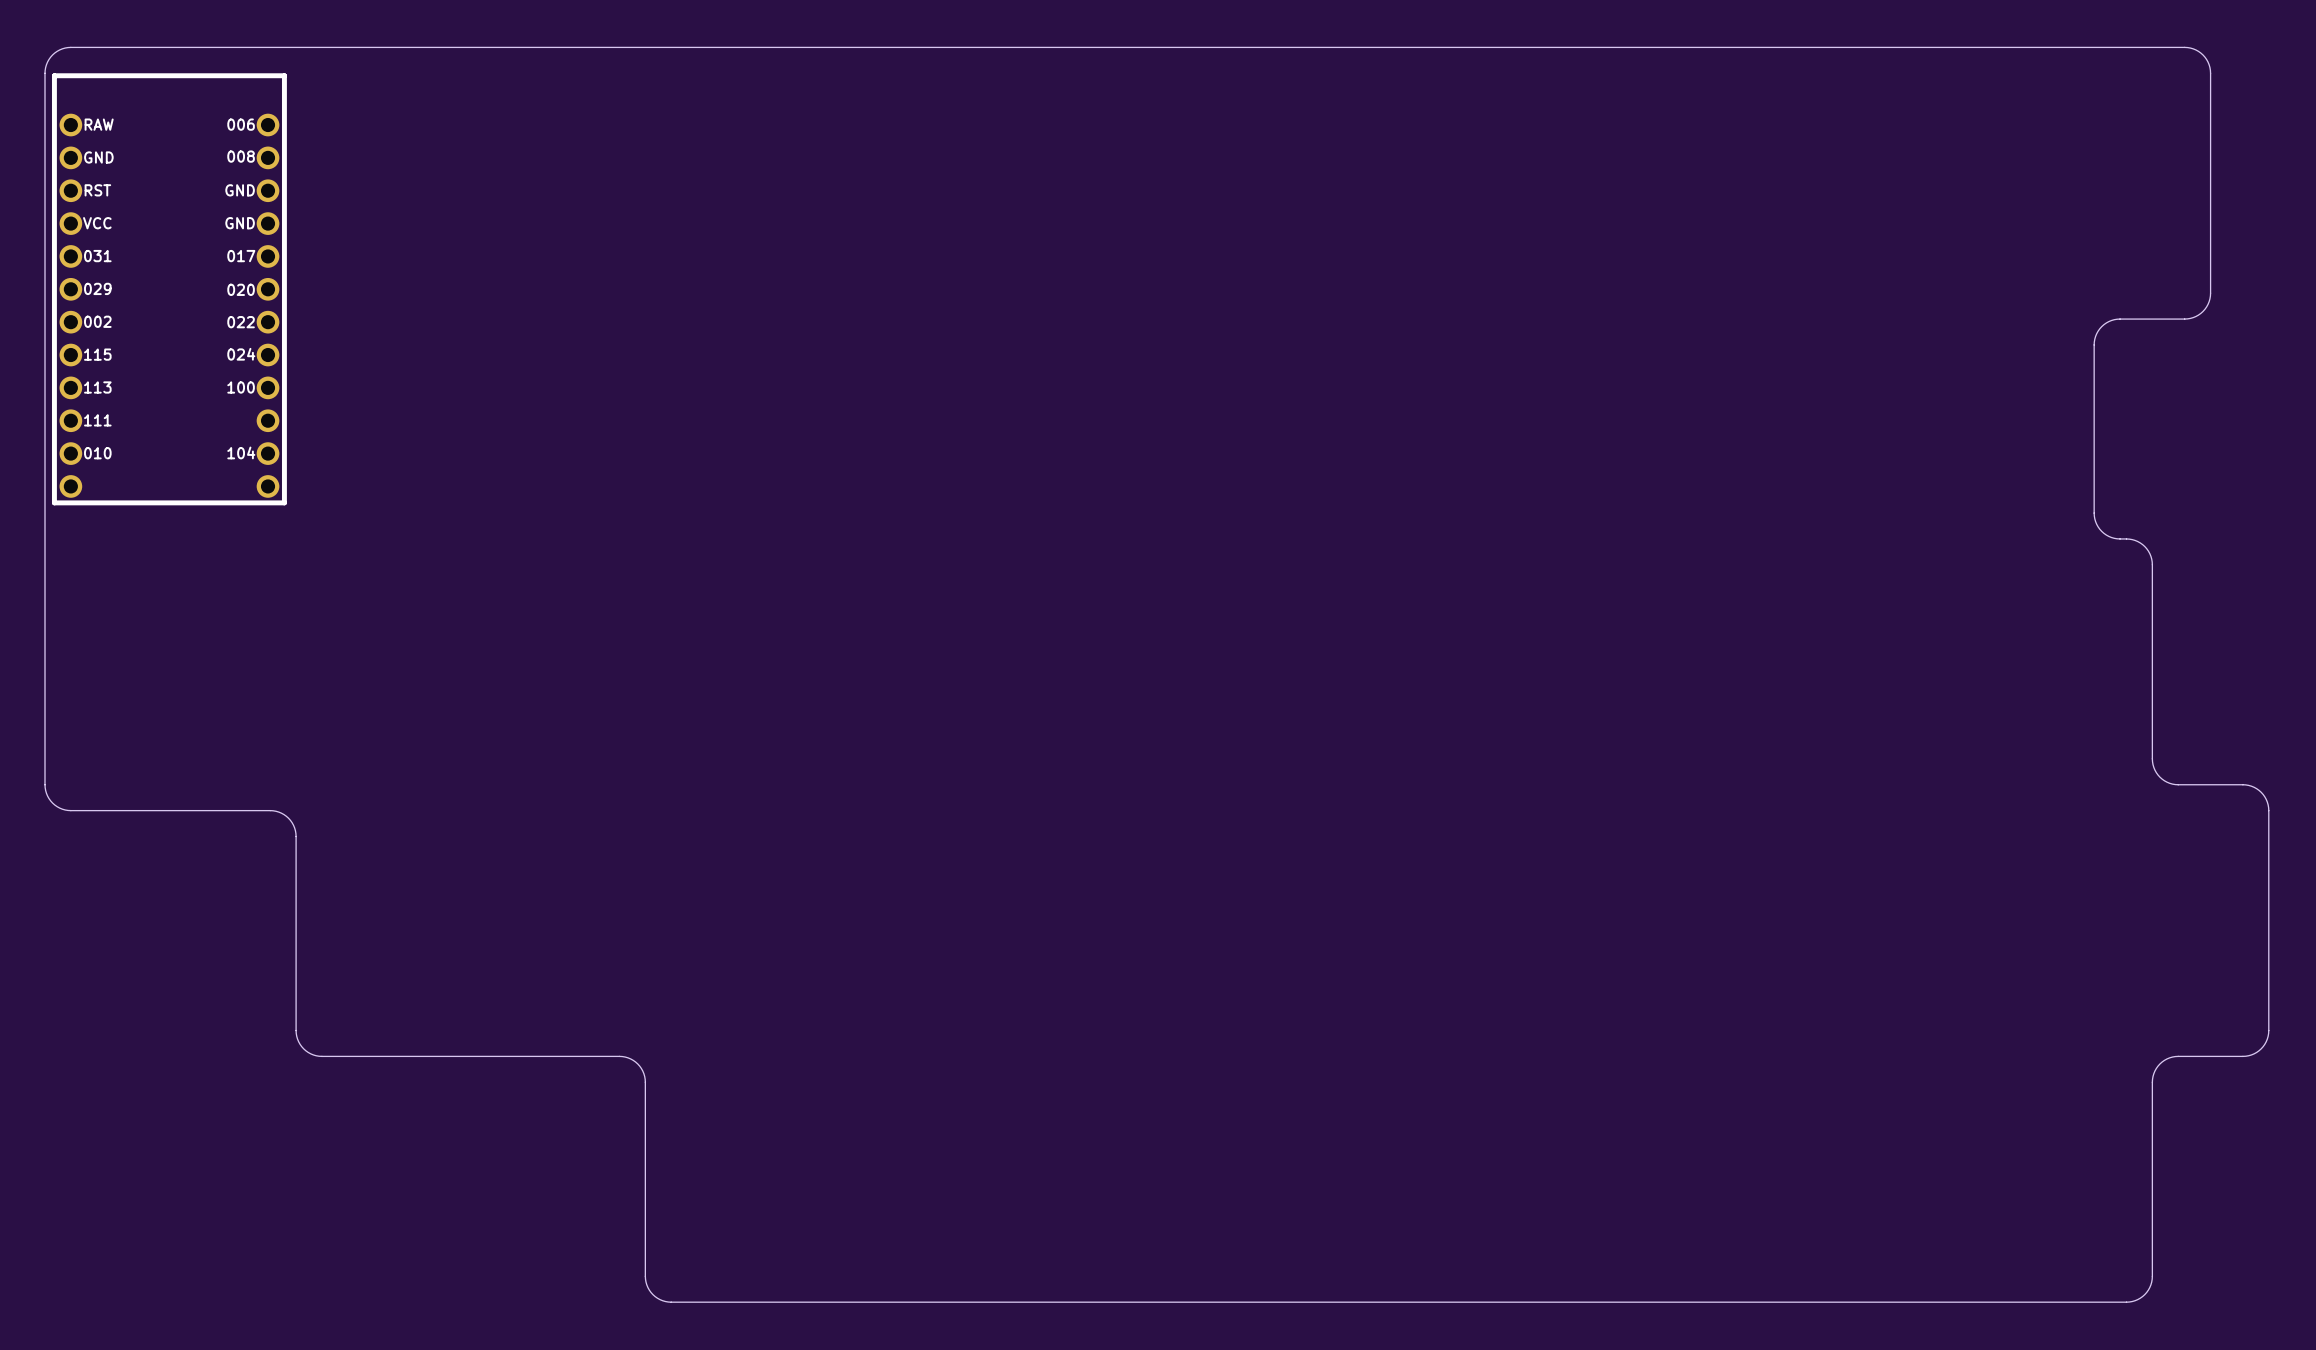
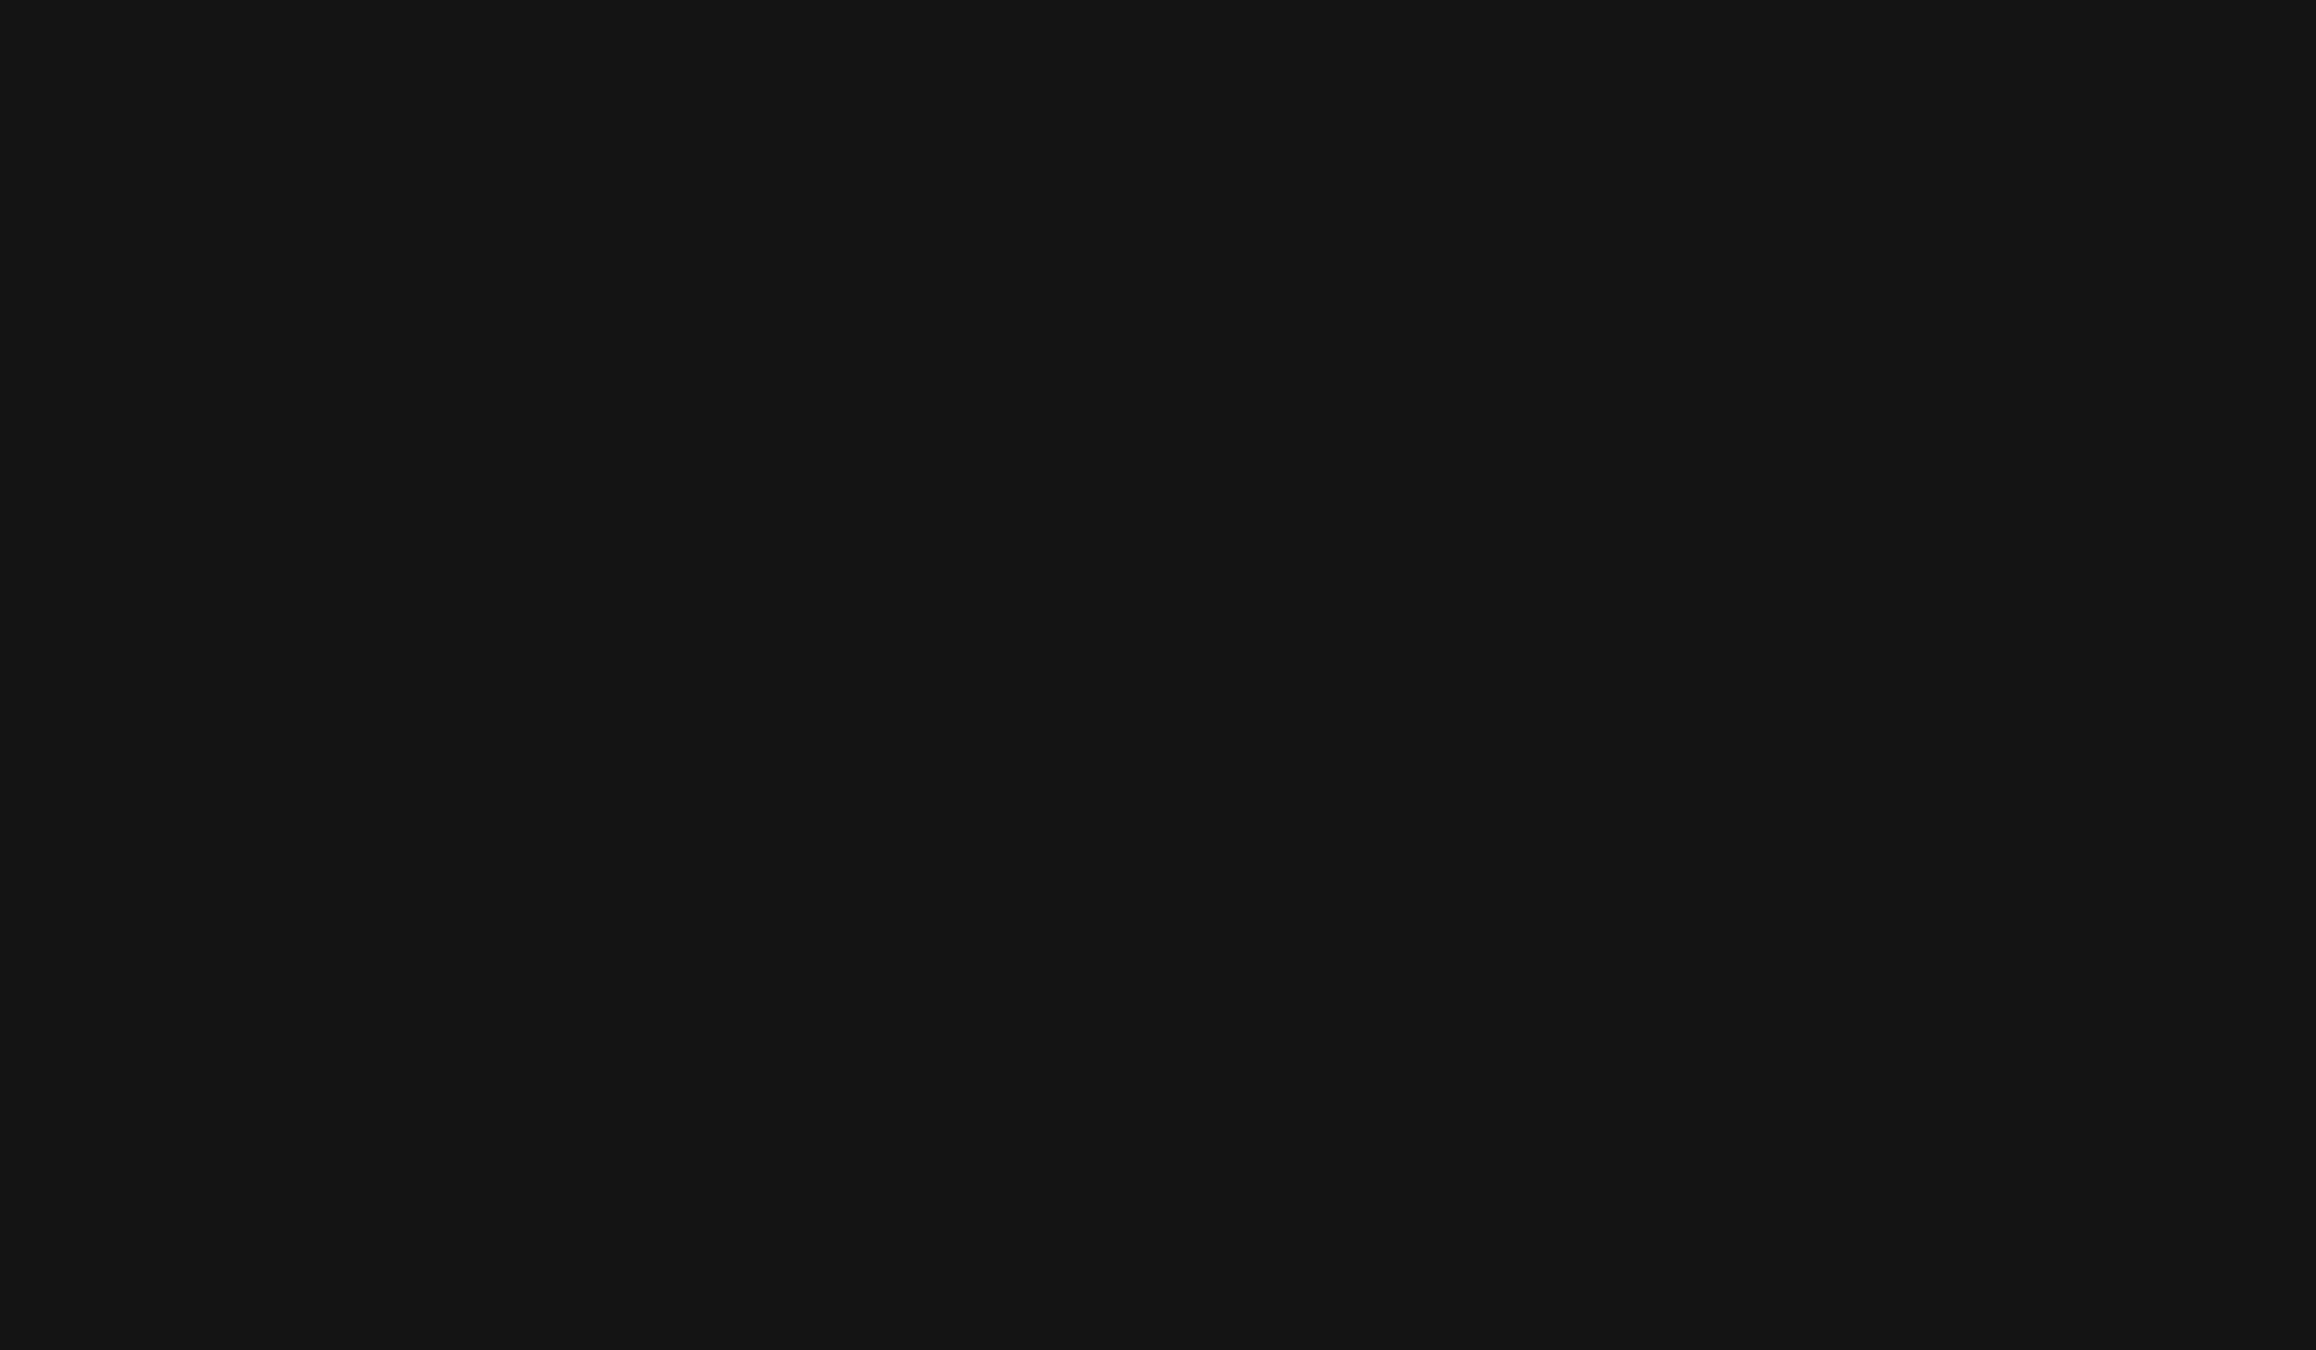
board edge: (2184, 47) (62, 48) (50, 57) (45, 73) (46, 793) (54, 804) (67, 810) (270, 810) (278, 812) (288, 818) (294, 827) (296, 836) (296, 1033) (300, 1044) (310, 1053) (321, 1056) (619, 1056) (635, 1062) (642, 1071) (645, 1082) (645, 1279) (652, 1294) (665, 1301) (2135, 1300) (2146, 1292) (2152, 1279) (2152, 1082) (2154, 1071) (2164, 1060) (2175, 1056) (2251, 1054) (2264, 1044) (2268, 1030) (2267, 802) (2259, 790) (2248, 785) (2175, 784) (2164, 780) (2156, 772) (2152, 758) (2151, 559) (2146, 548) (2137, 541) (2114, 538) (2103, 533) (2096, 524) (2094, 515) (2094, 344) (2096, 333) (2106, 323) (2117, 319) (2193, 317) (2204, 309) (2209, 298) (2210, 70) (2203, 54) (2195, 49) (2184, 47) -> none
part: (169, 289) -> none

